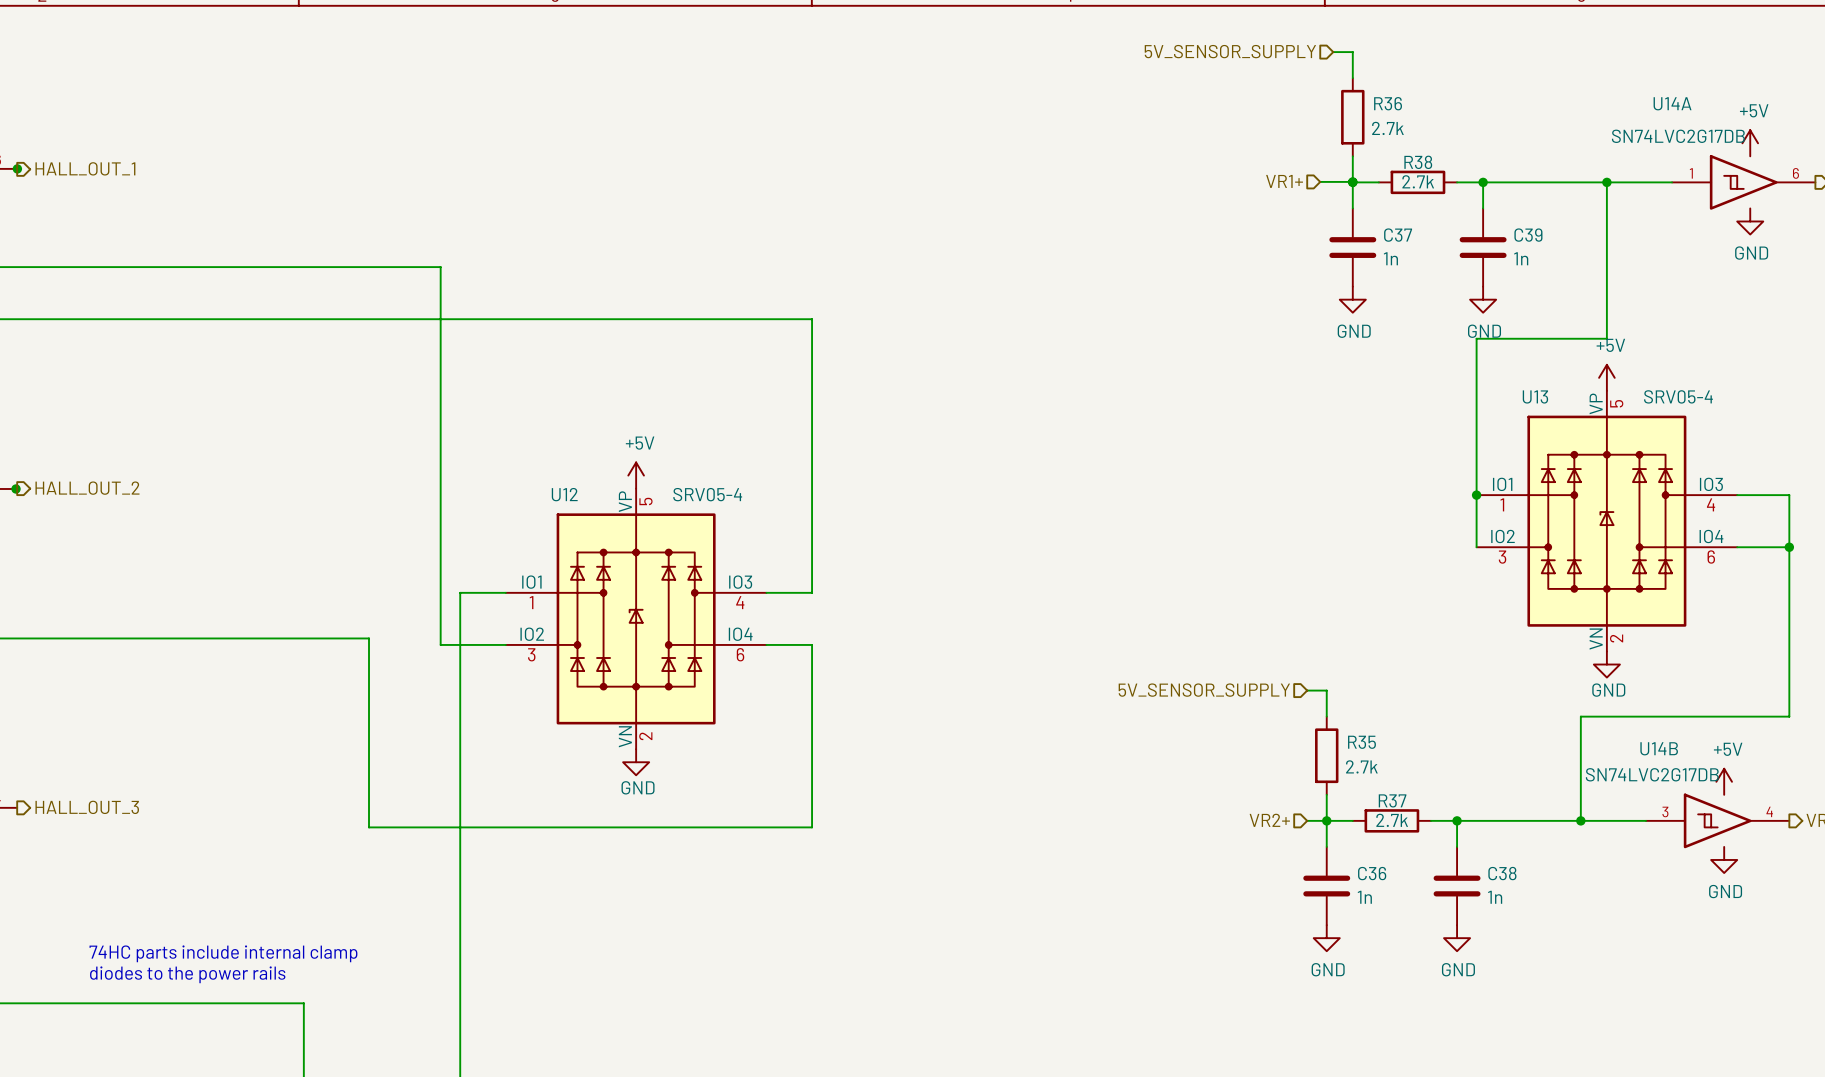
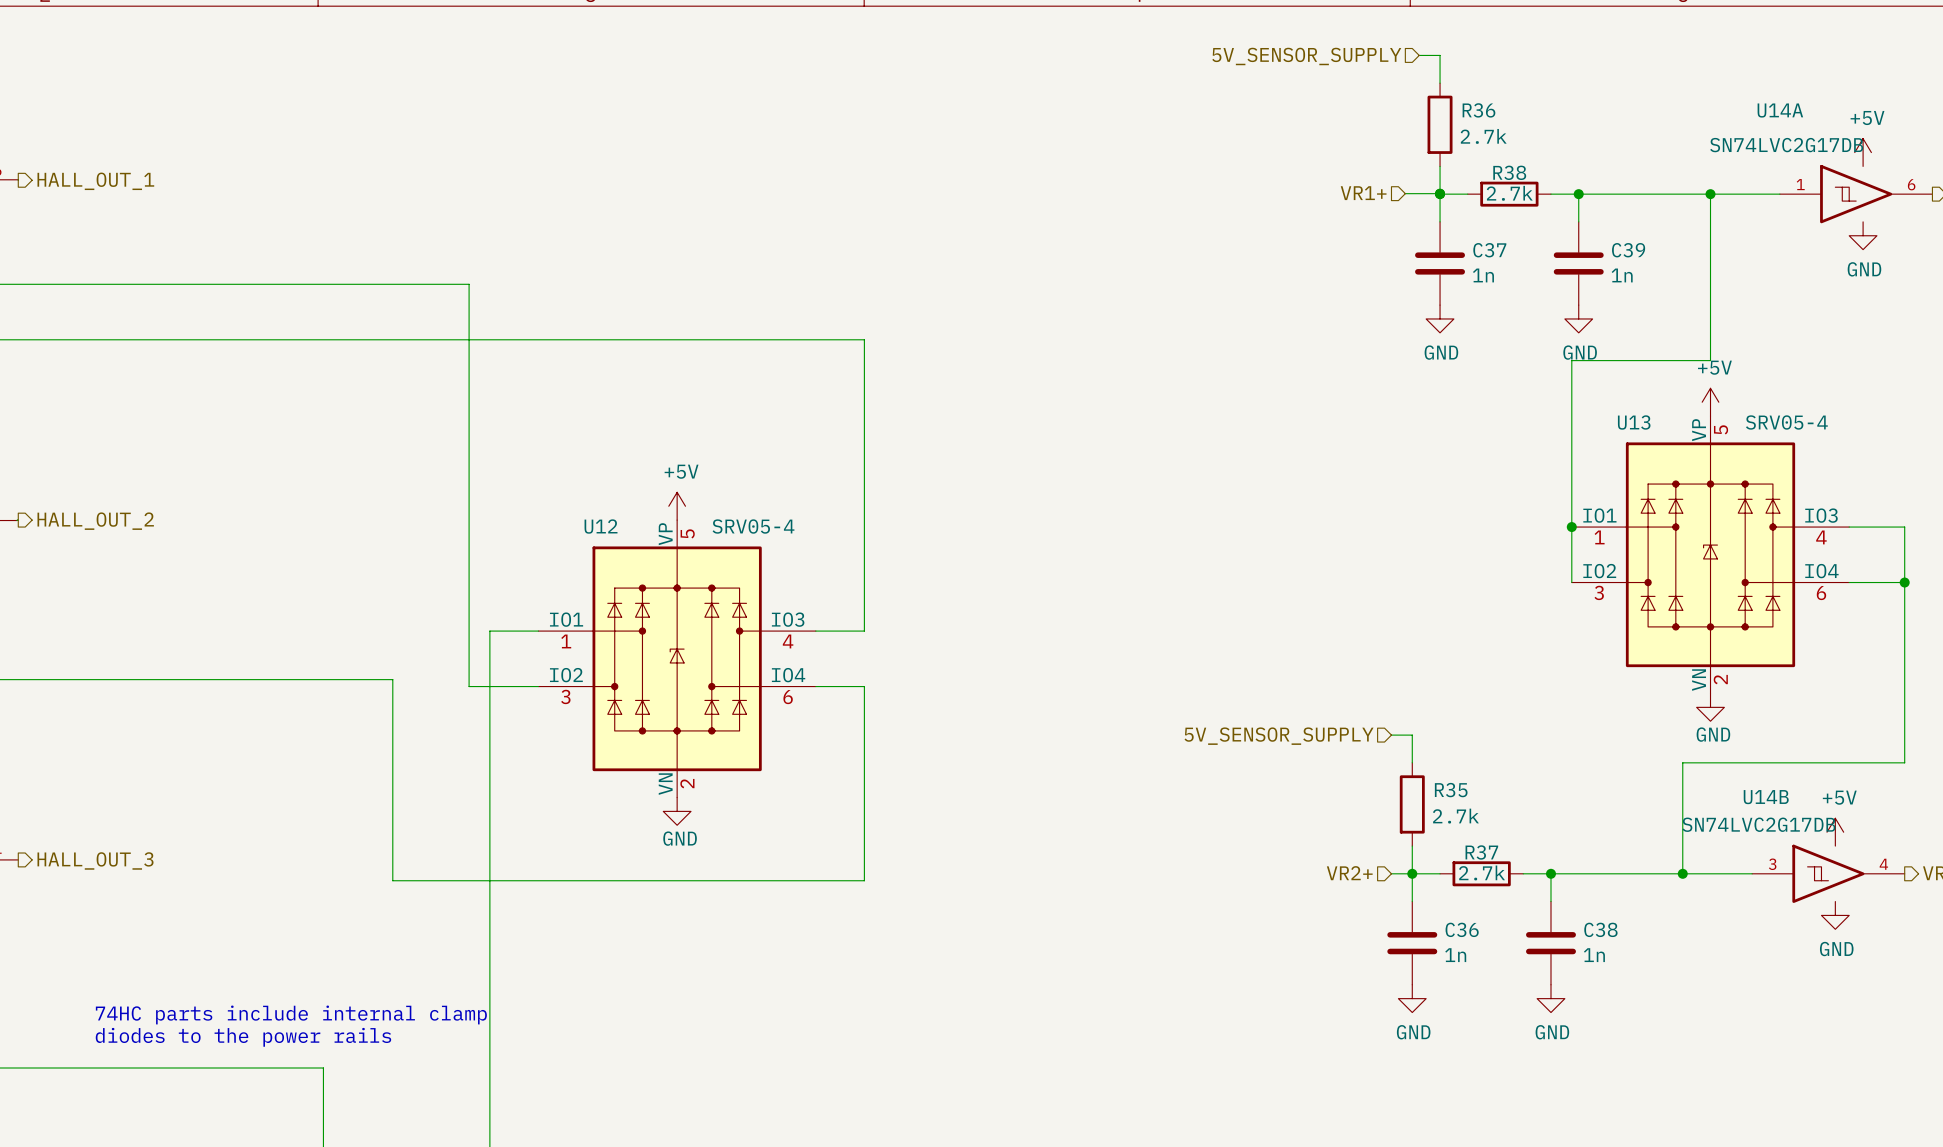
junction: (17, 168) -> none
junction: (16, 488) -> none

